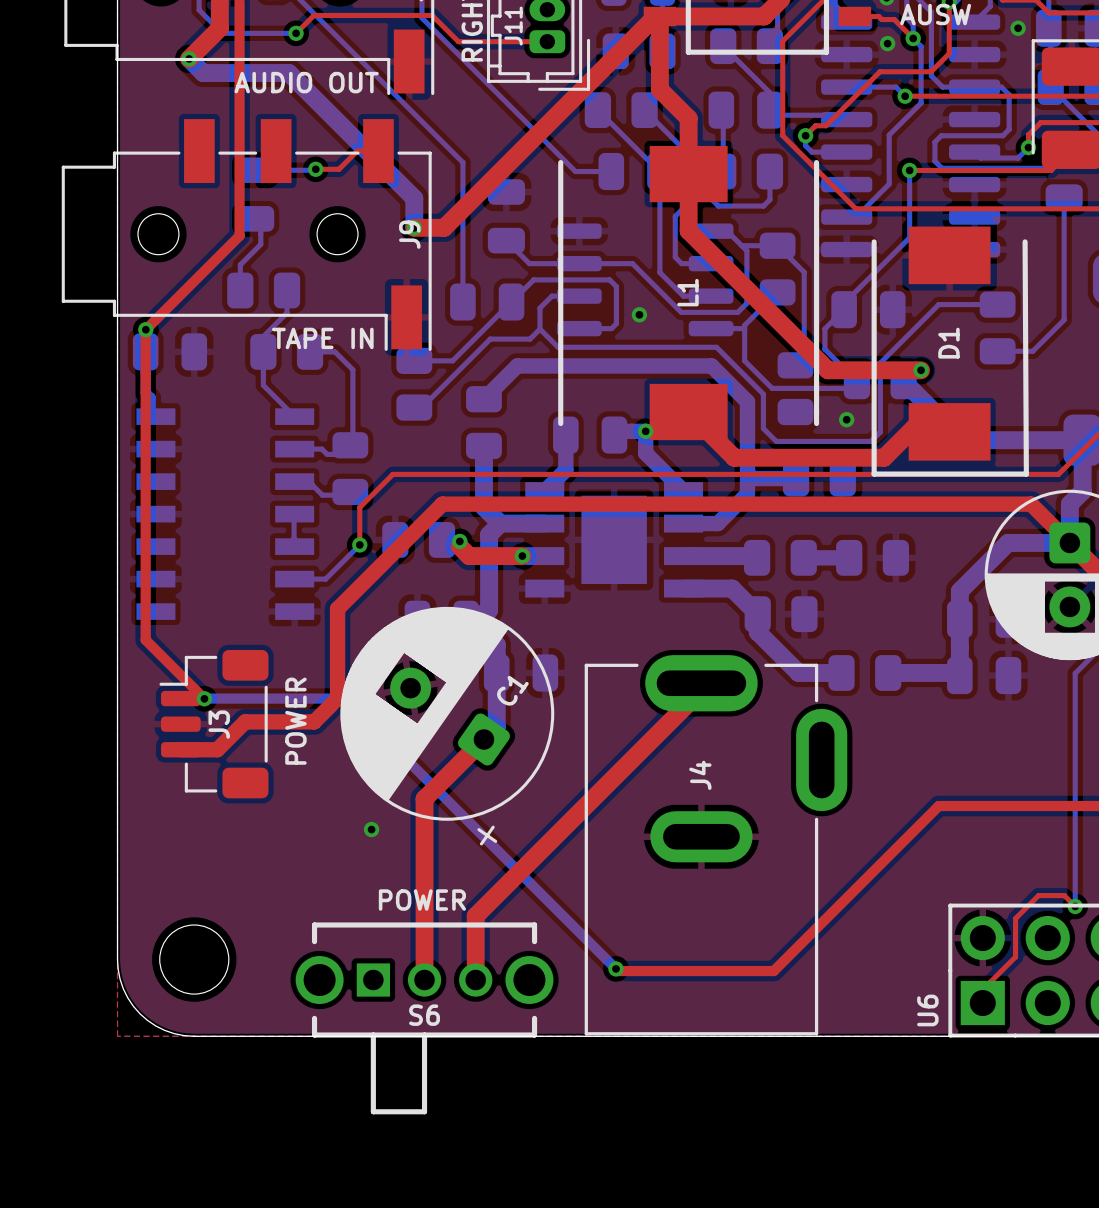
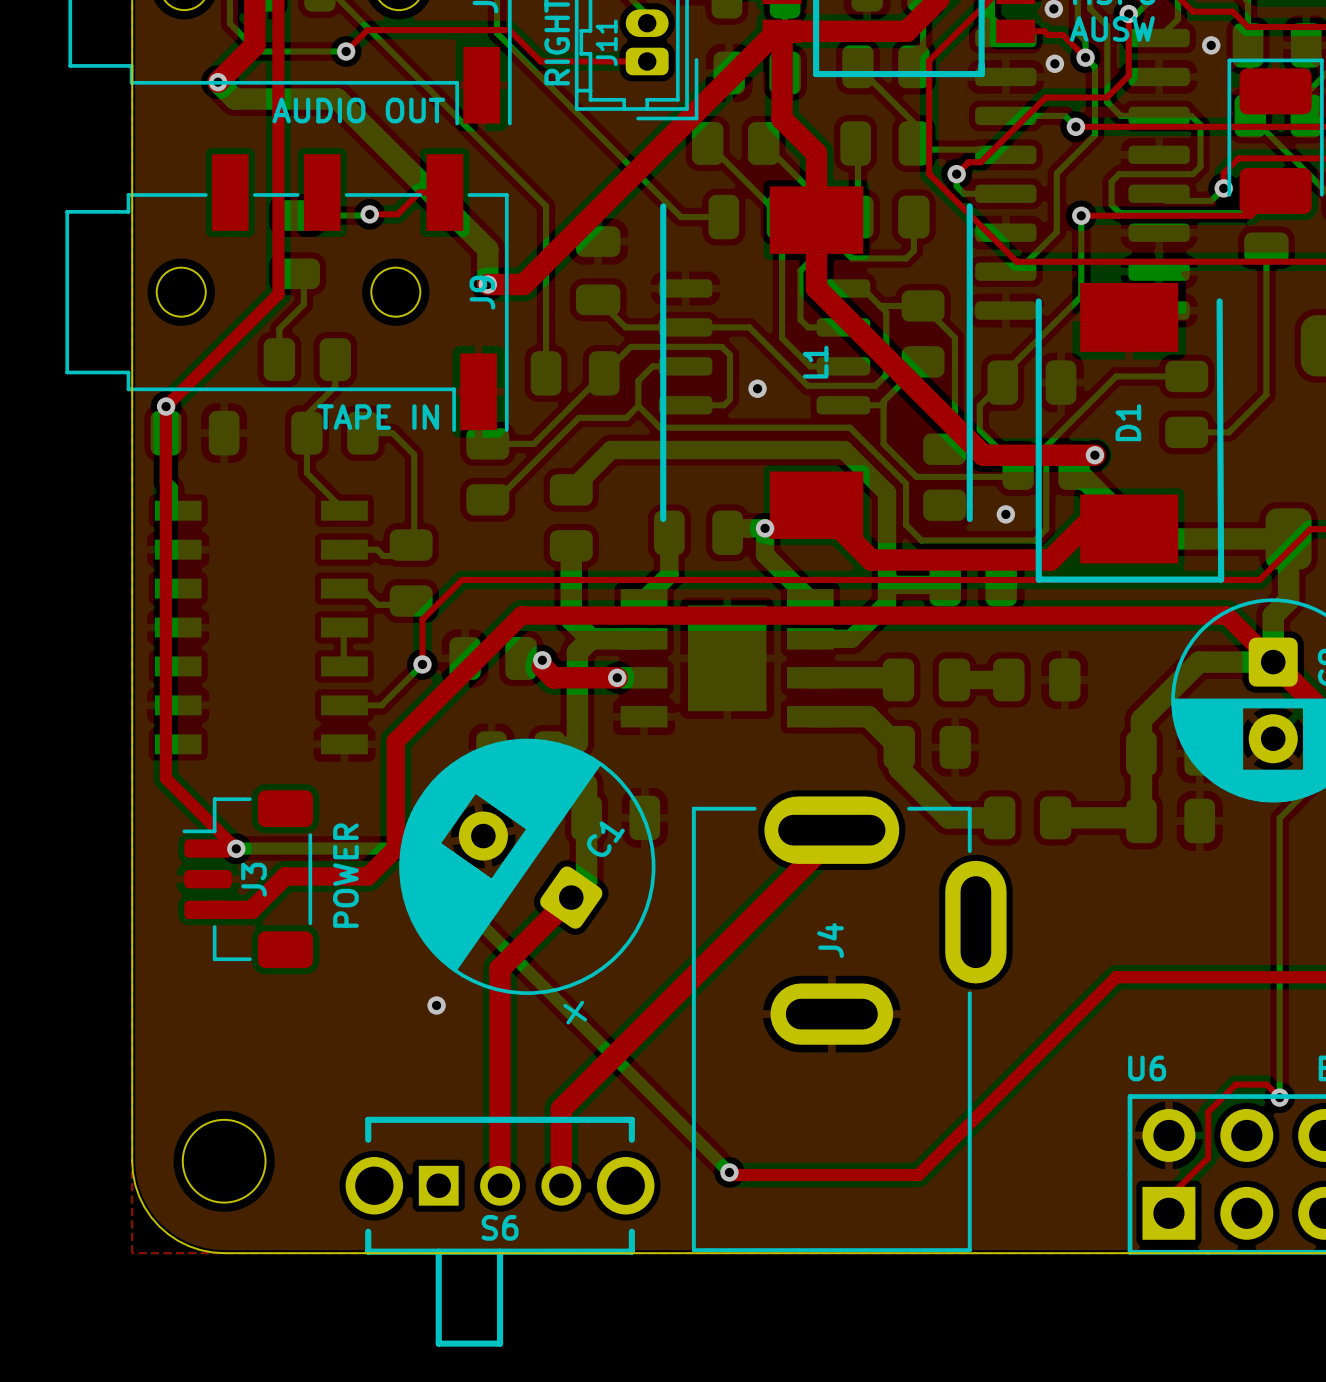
text: POWER (422, 900) -> none
U6 name rotation: 0° (927, 1010) -> 90° clockwise (1147, 1068)
U6 name position: U6 (927, 1010) -> U6 (1147, 1068)

